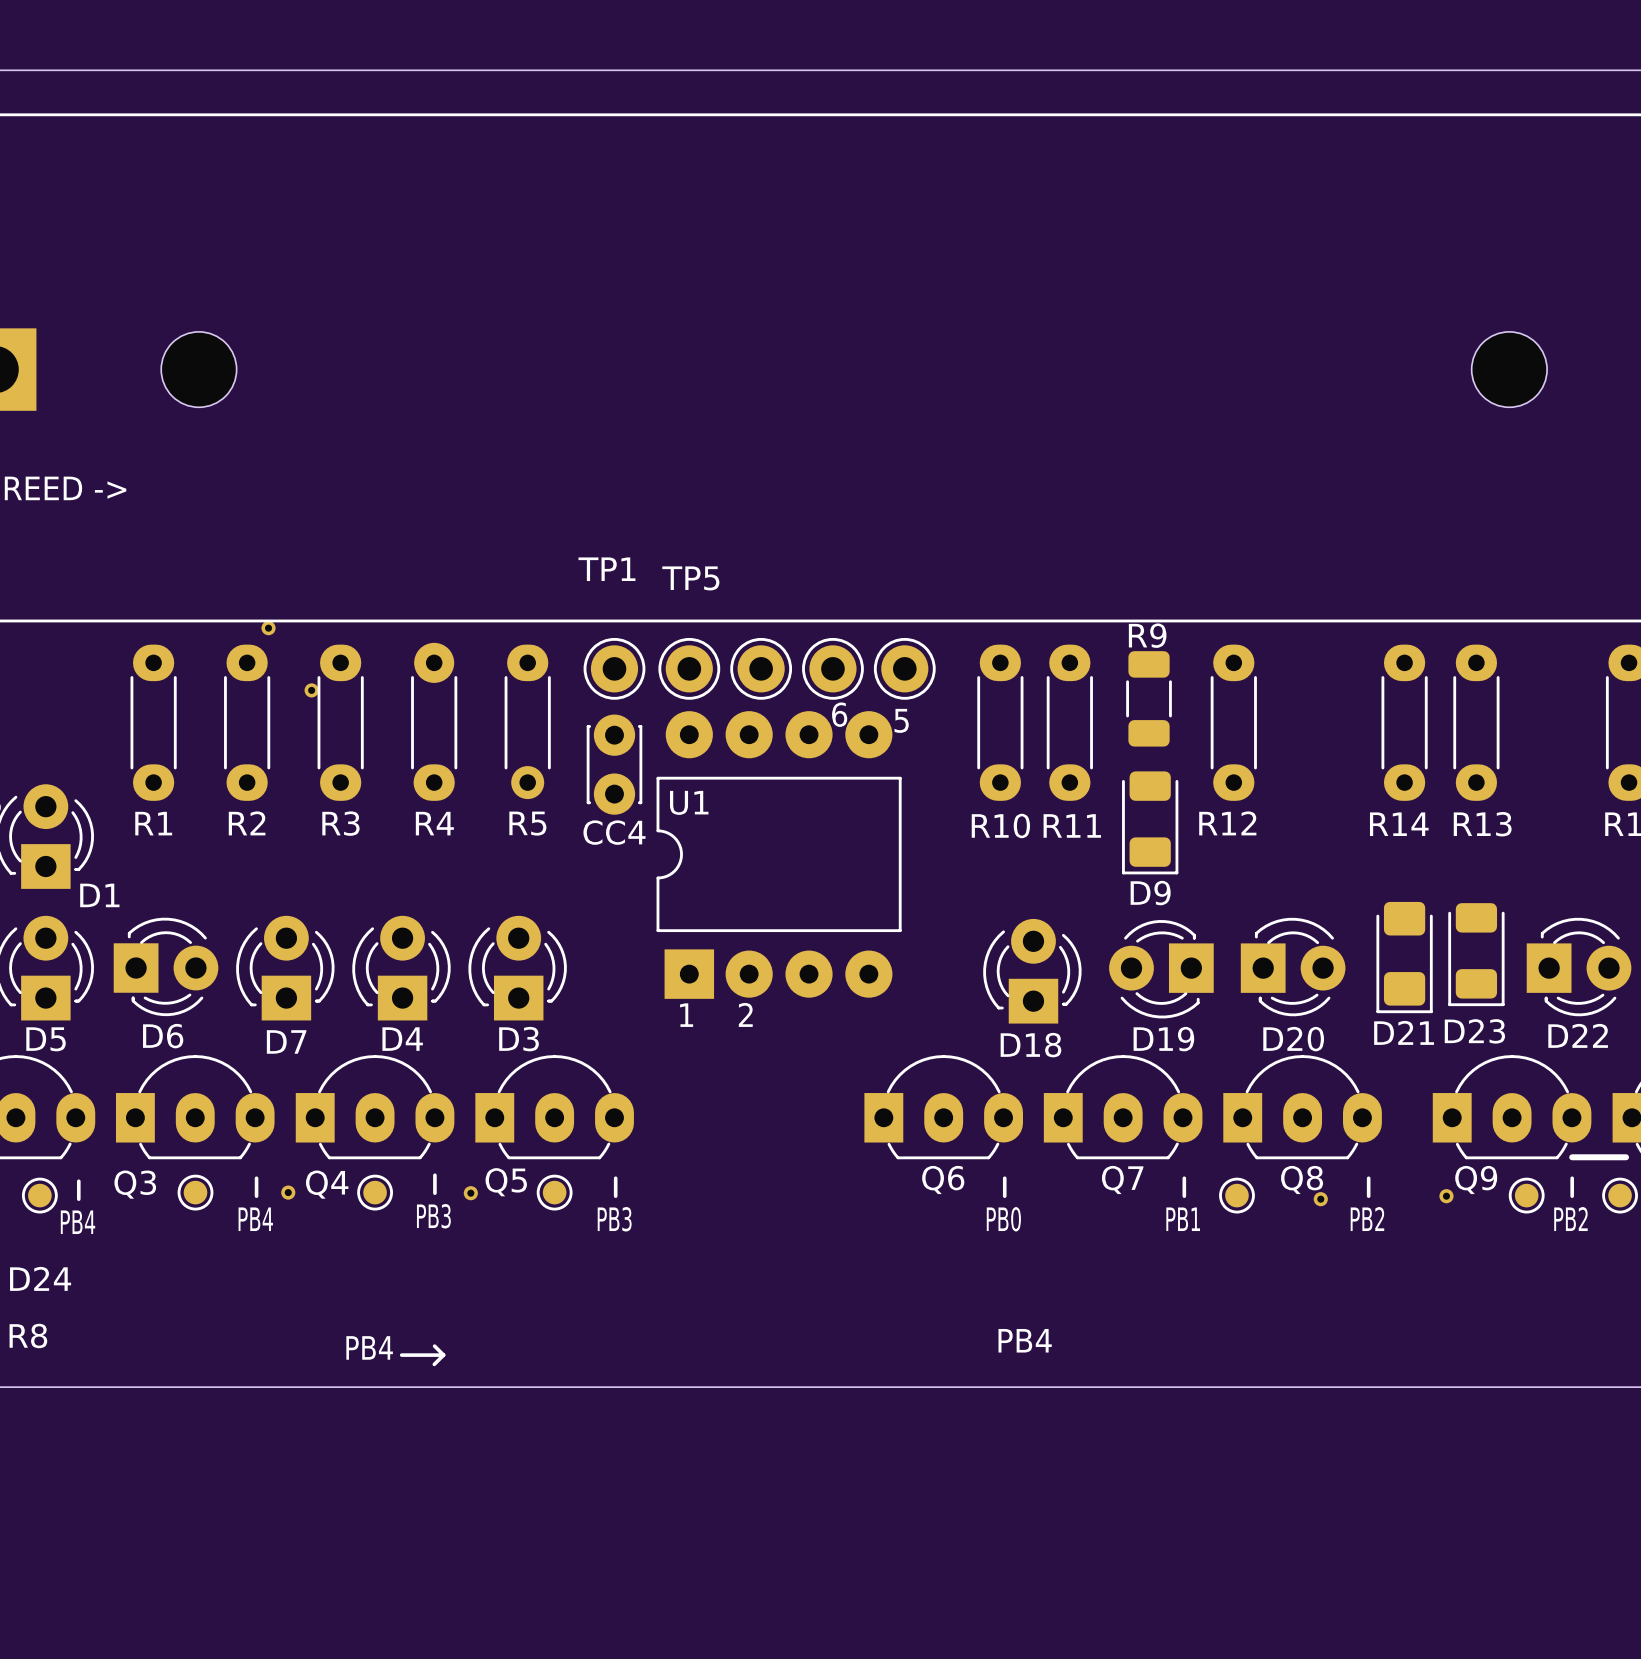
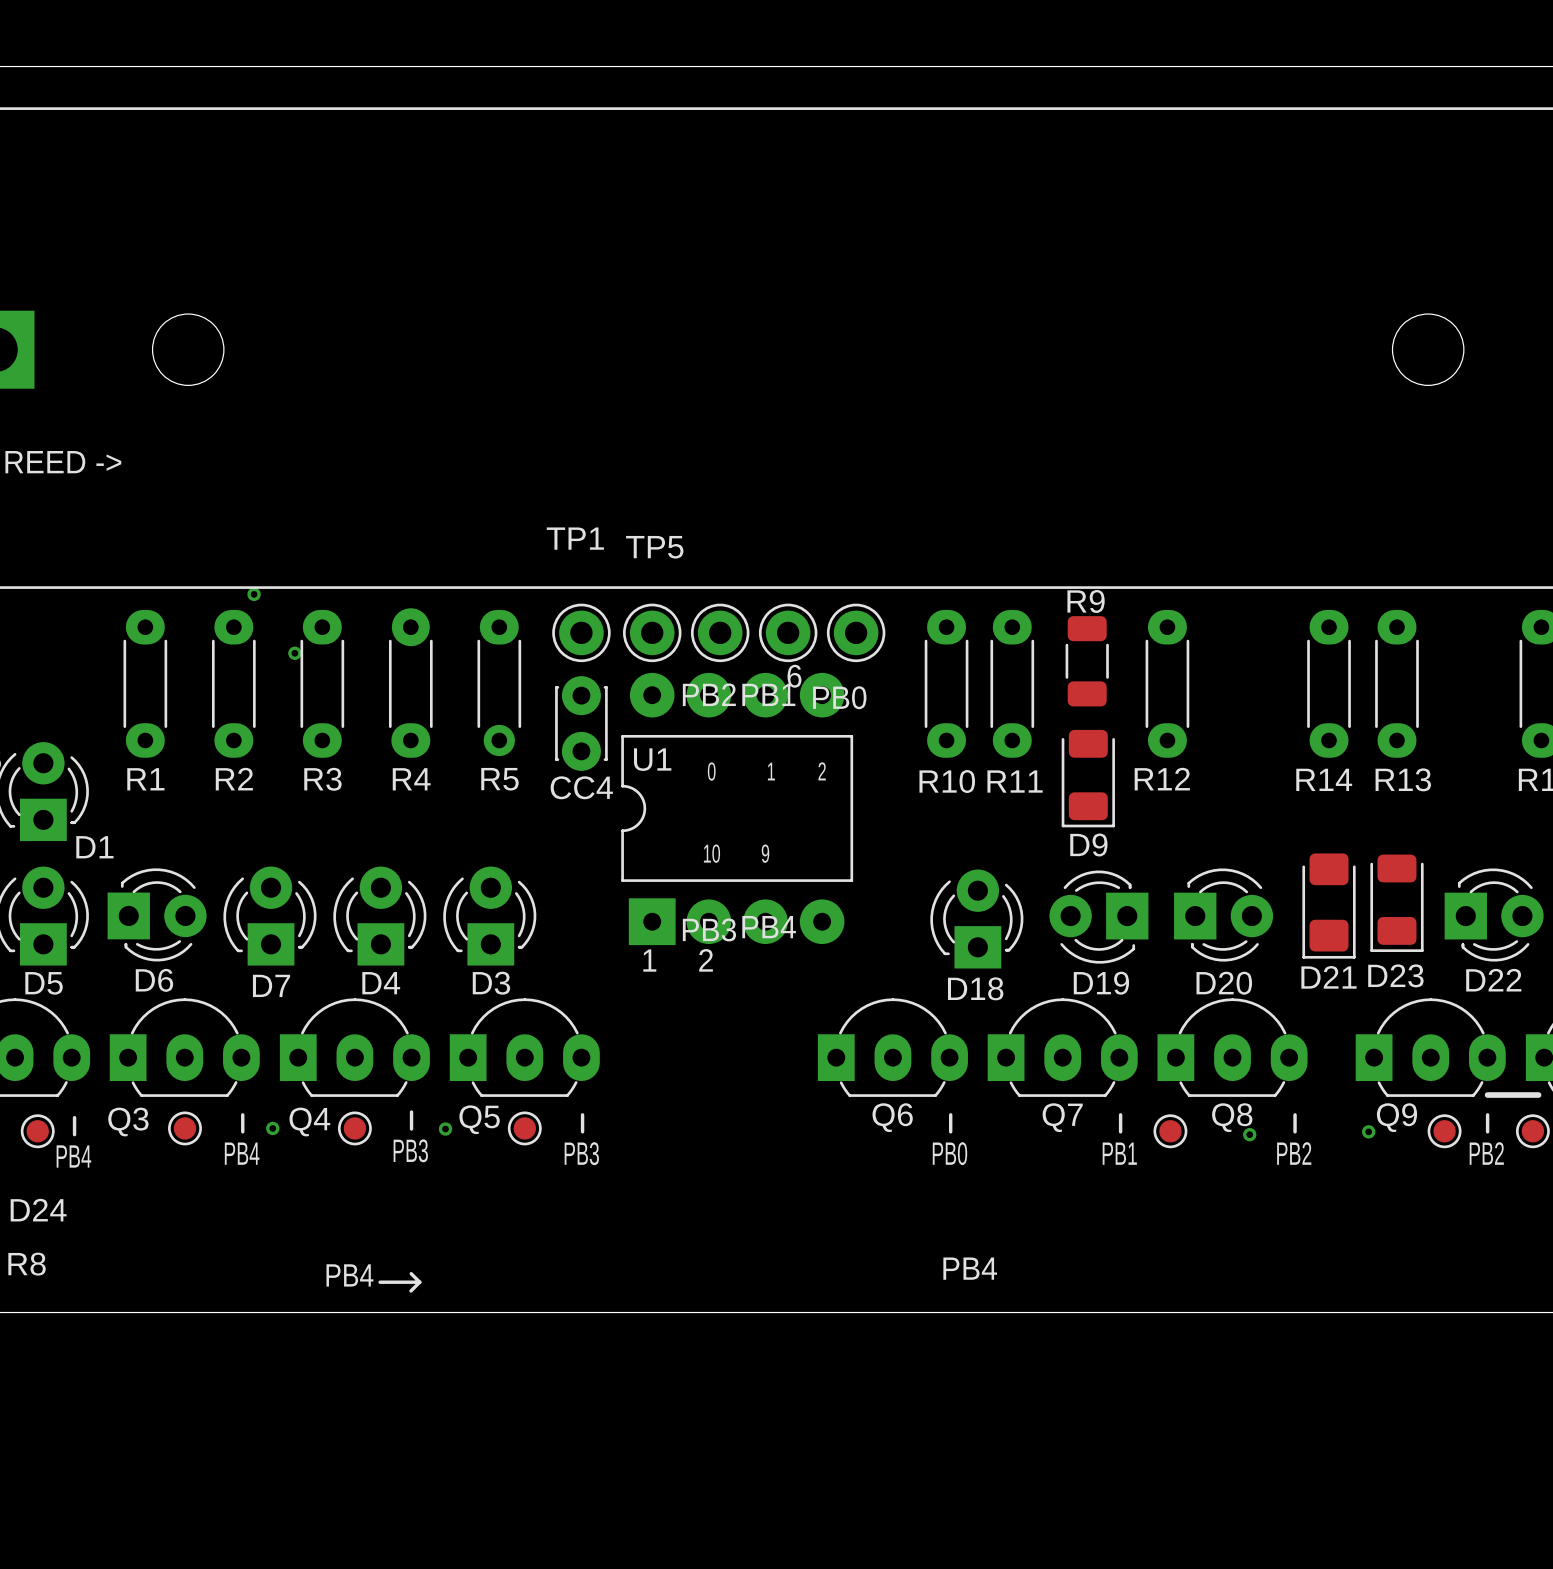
text: 5 (901, 720) -> PB0 (839, 697)
text: none -> PB2 (709, 694)
text: none -> PB1 (768, 694)
text: none -> 0 (711, 771)
text: none -> 1 (771, 771)
text: none -> 2 (822, 771)
text: none -> 10 (712, 853)
text: none -> 9 (765, 853)
text: none -> PB4 (769, 927)
text: none -> PB3 (709, 929)

